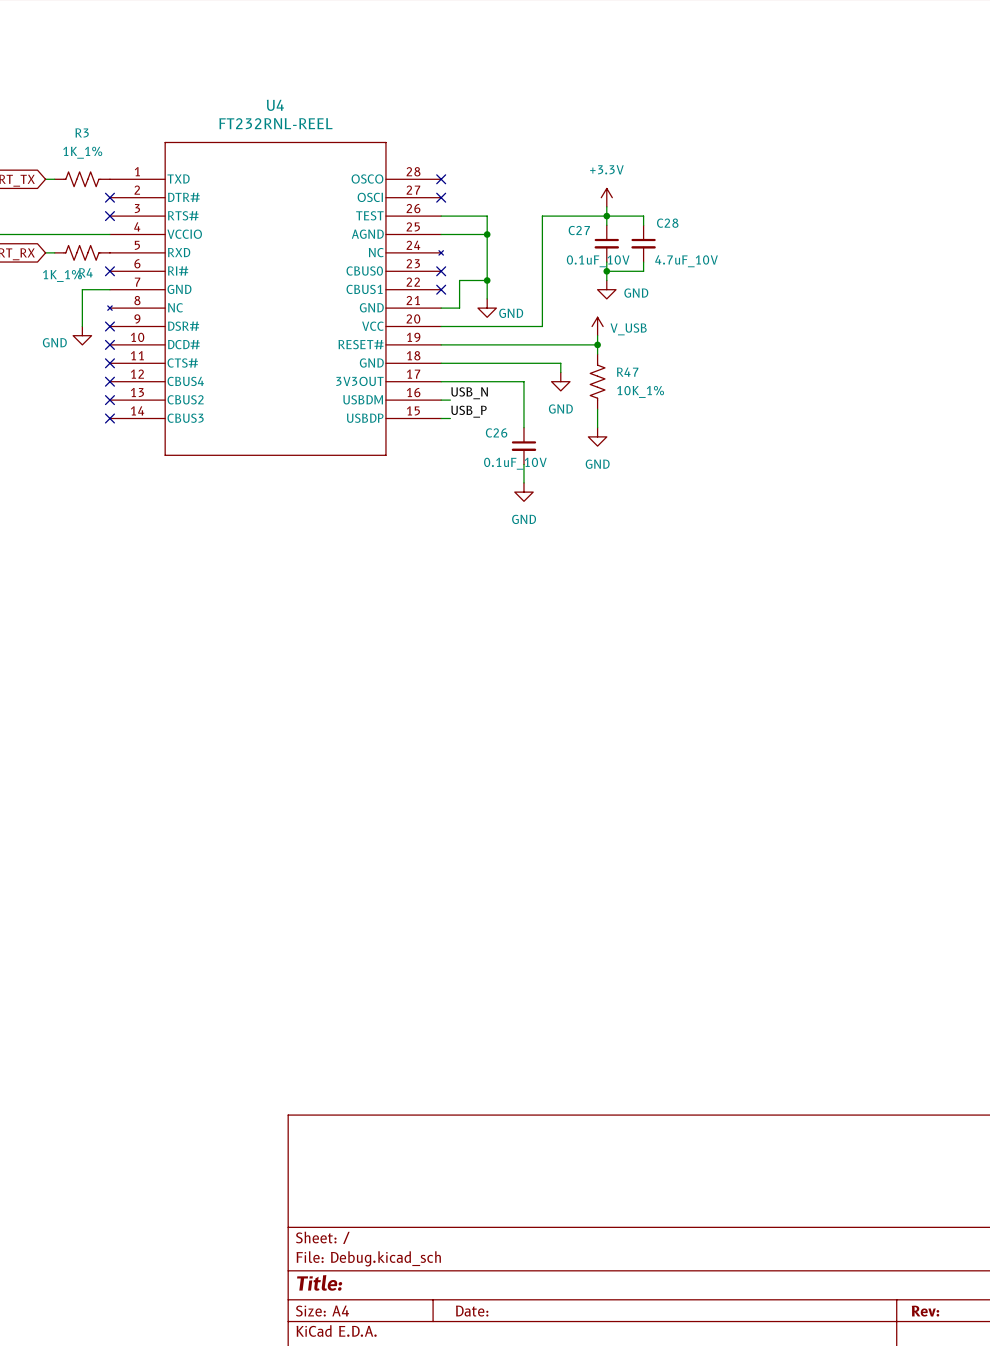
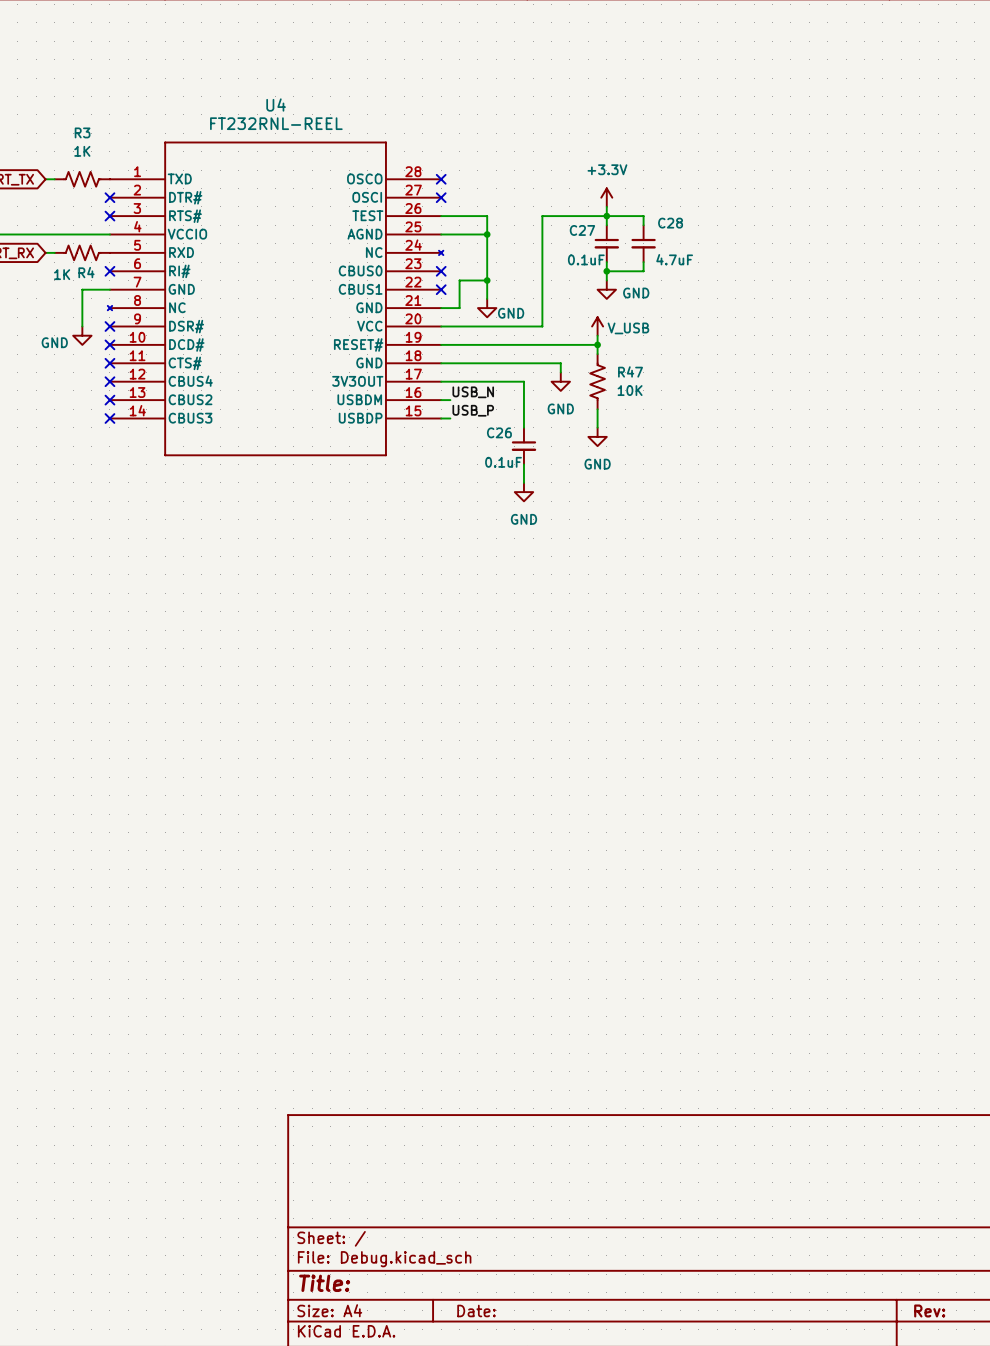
R3 value: 1K_1% (82, 152) -> 1K (82, 151)
C27 value: 0.1uF_10V (598, 261) -> 0.1uF (586, 259)
C28 value: 4.7uF_10V (686, 261) -> 4.7uF (674, 259)
R4 value: 1K_1% (62, 276) -> 1K (62, 274)
R47 value: 10K_1% (640, 391) -> 10K (630, 390)
C26 value: 0.1uF_10V (515, 463) -> 0.1uF (503, 462)

